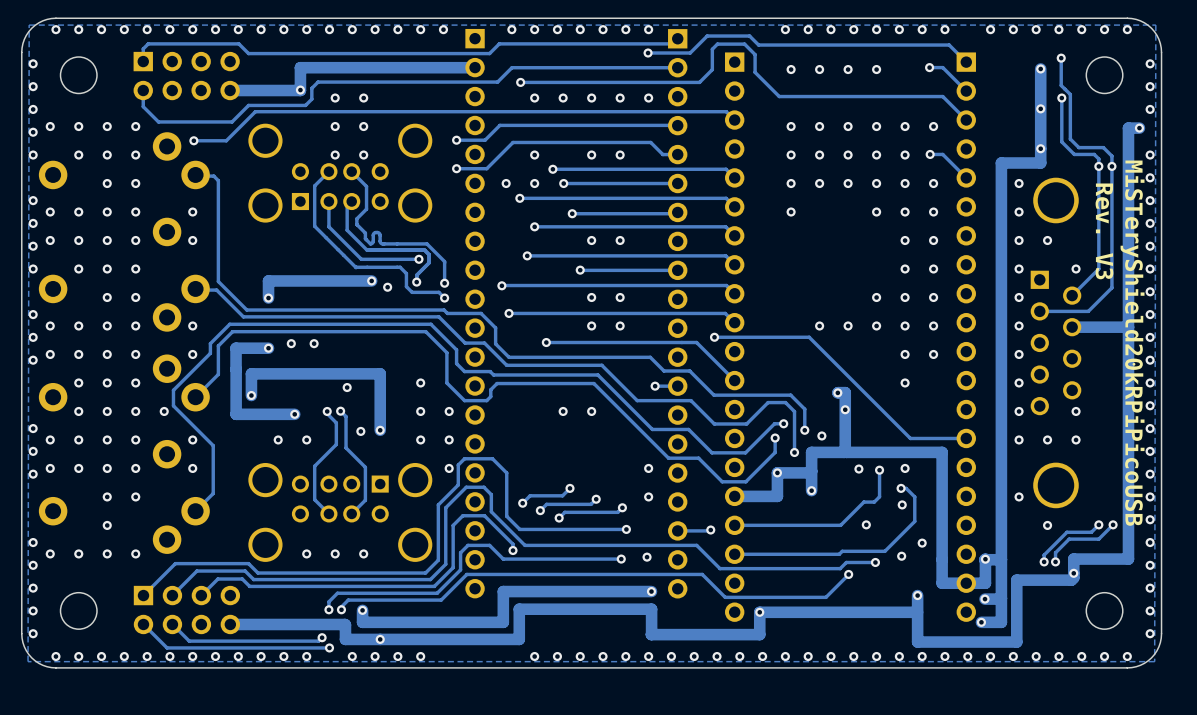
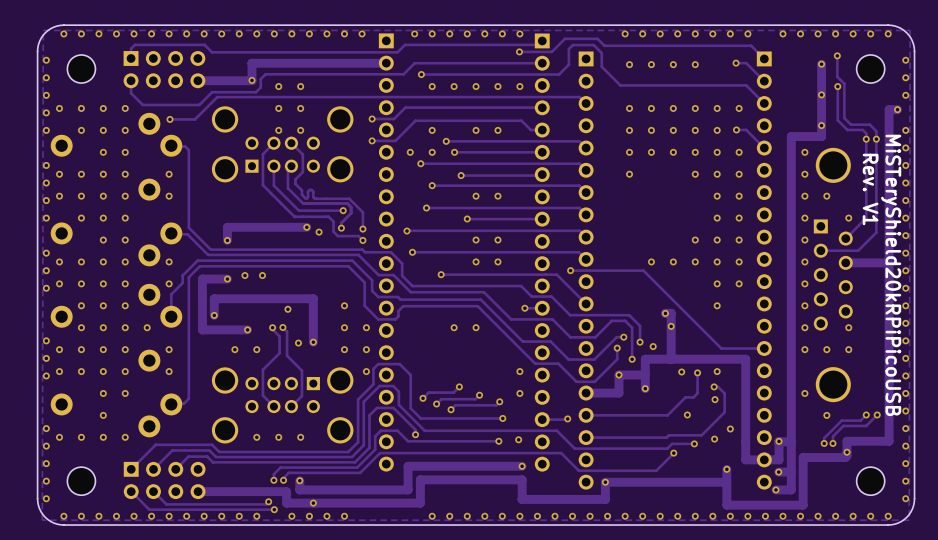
text: Rev. V3 (1104, 231) -> Rev. V1 (870, 189)
track: (195, 368) (173, 390) (173, 405) (213, 445) (213, 493) (195, 511) -> (171, 294) (171, 315)
track: (218, 374) (195, 397) -> (188, 299) (188, 398) (184, 403) (171, 403)

